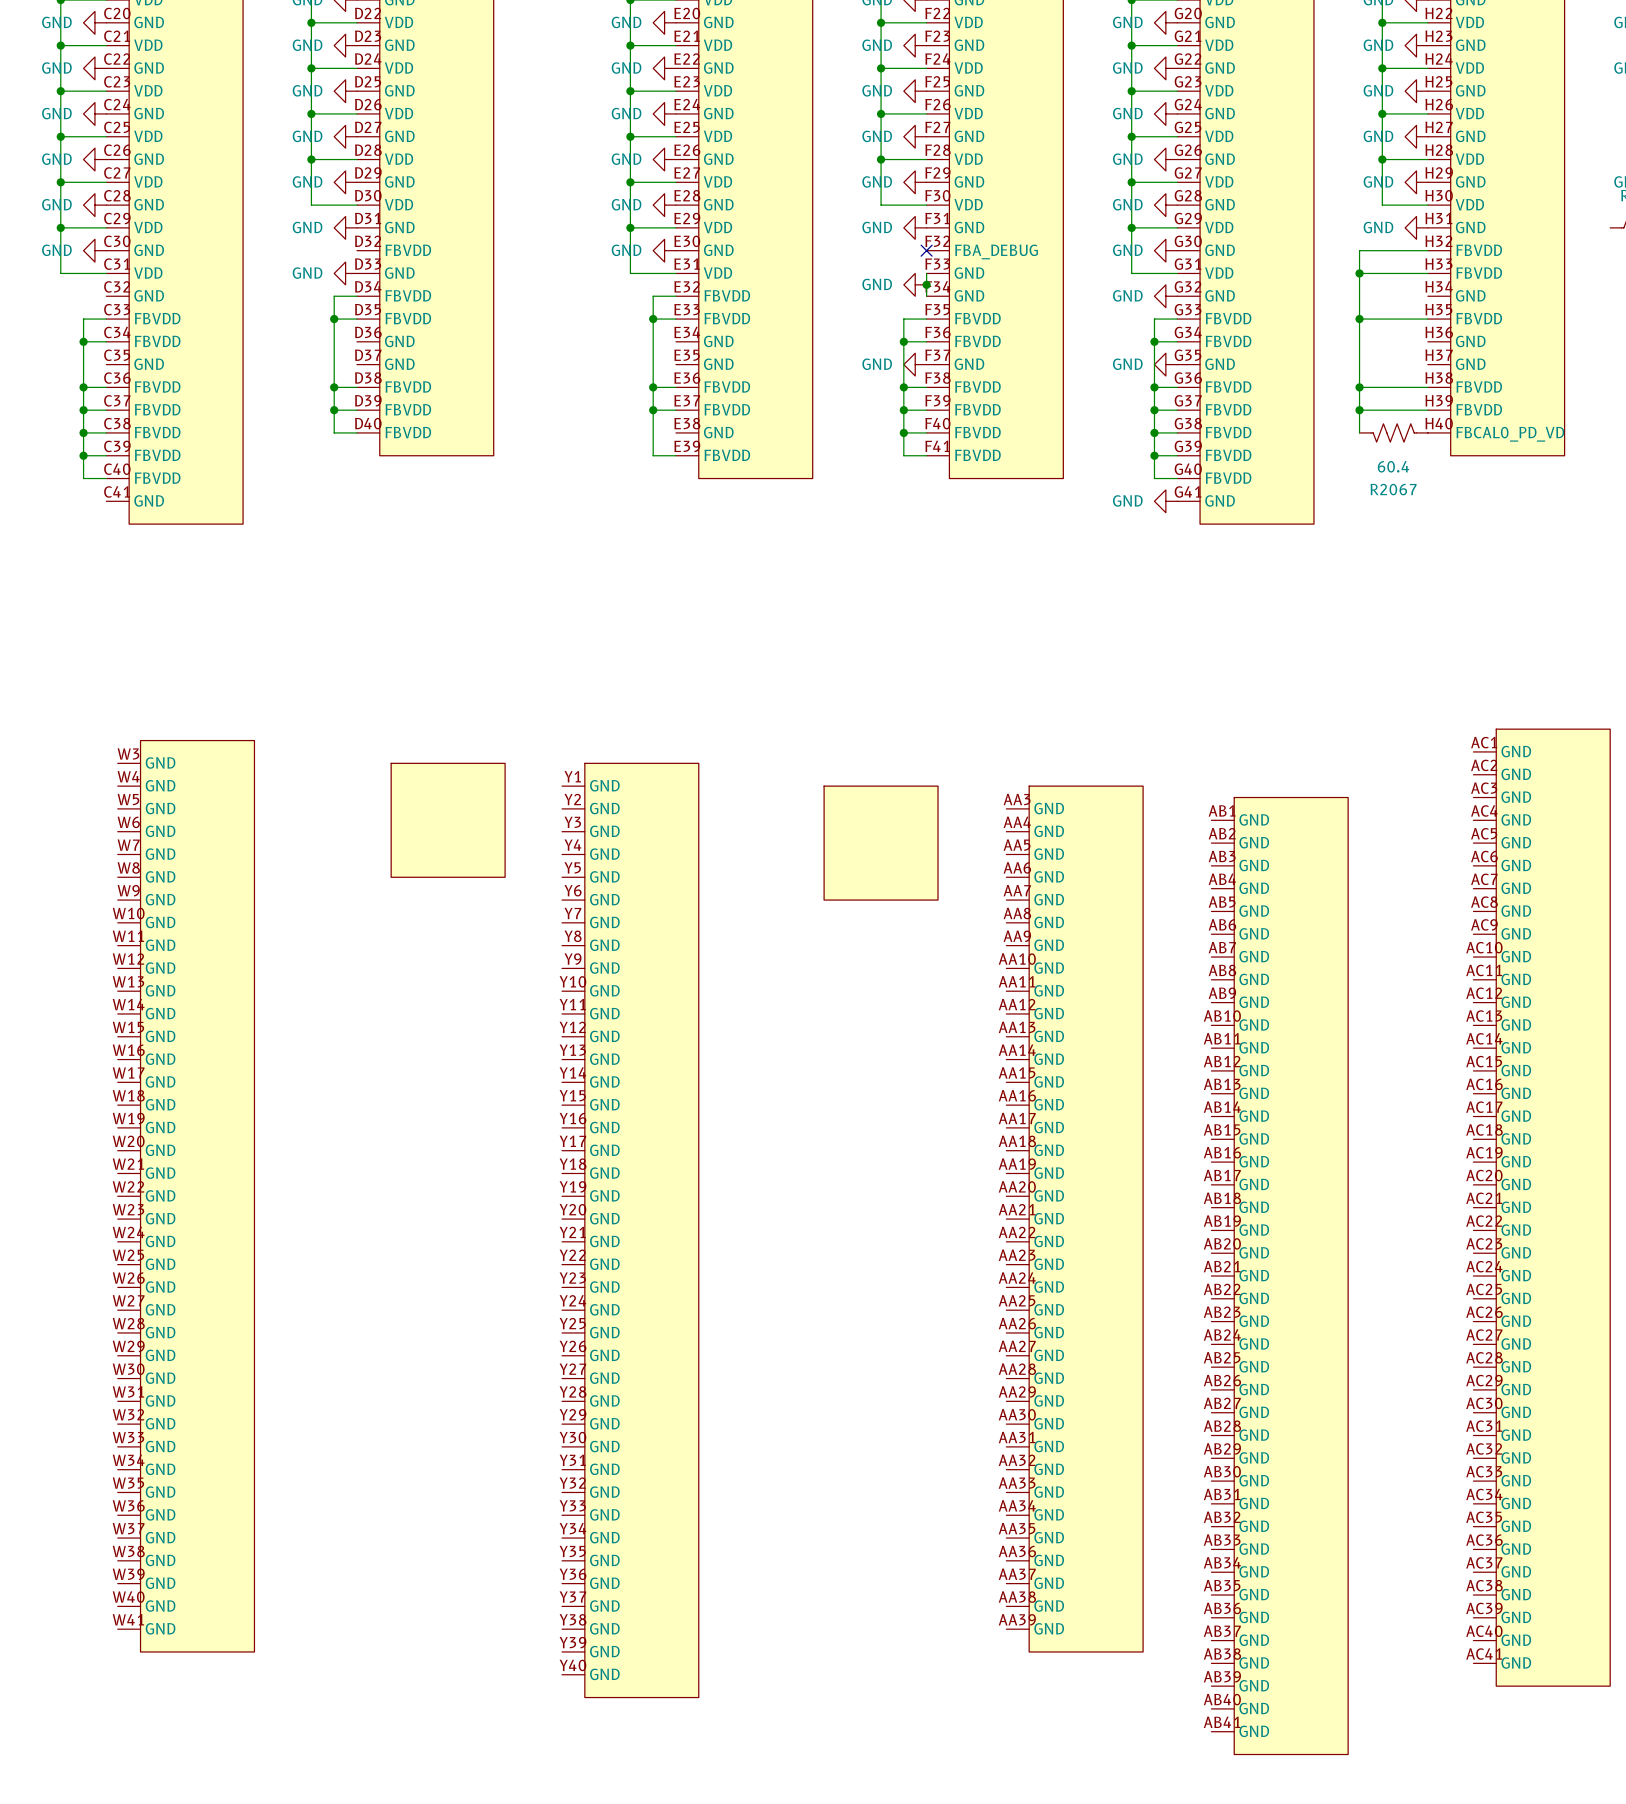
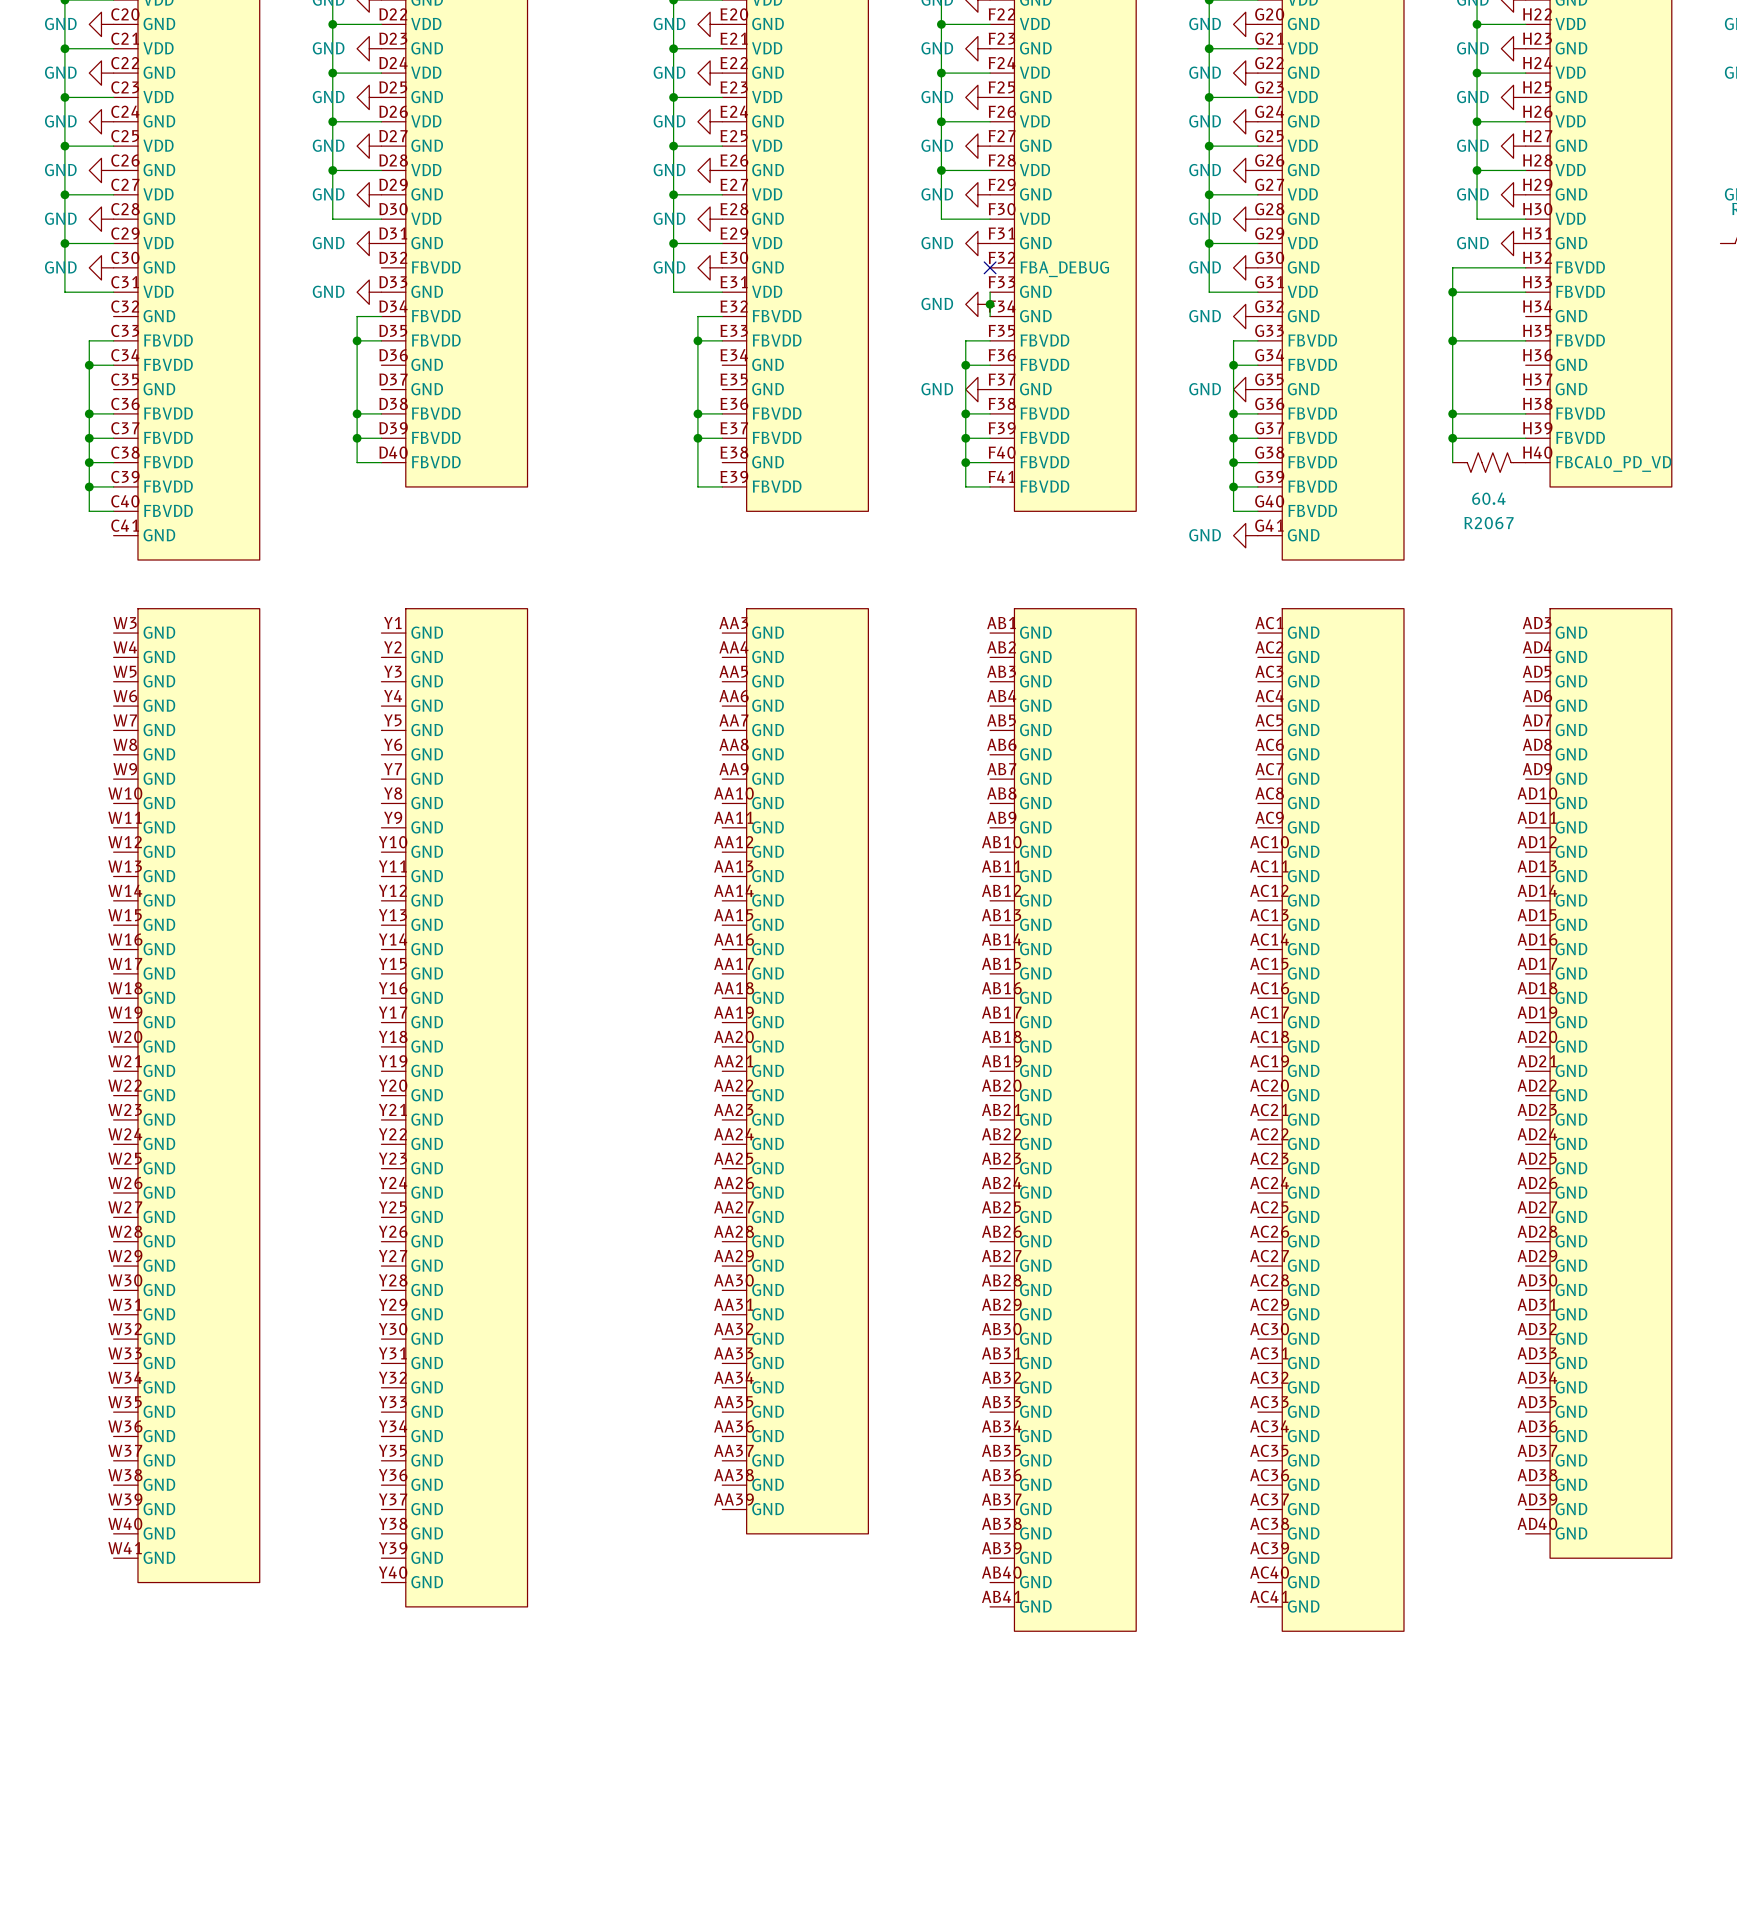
part: (448, 820) -> none
part: (881, 843) -> none
part: none -> (795, 1071)
part: none -> (1598, 1083)
part: none -> (454, 1107)
part: none -> (1063, 1119)
part: none -> (1330, 1119)
part position: (186, 1196) -> (186, 1095)
part: (1541, 1207) -> none
part: (1074, 1219) -> none
part: (630, 1230) -> none
part: (1279, 1276) -> none

